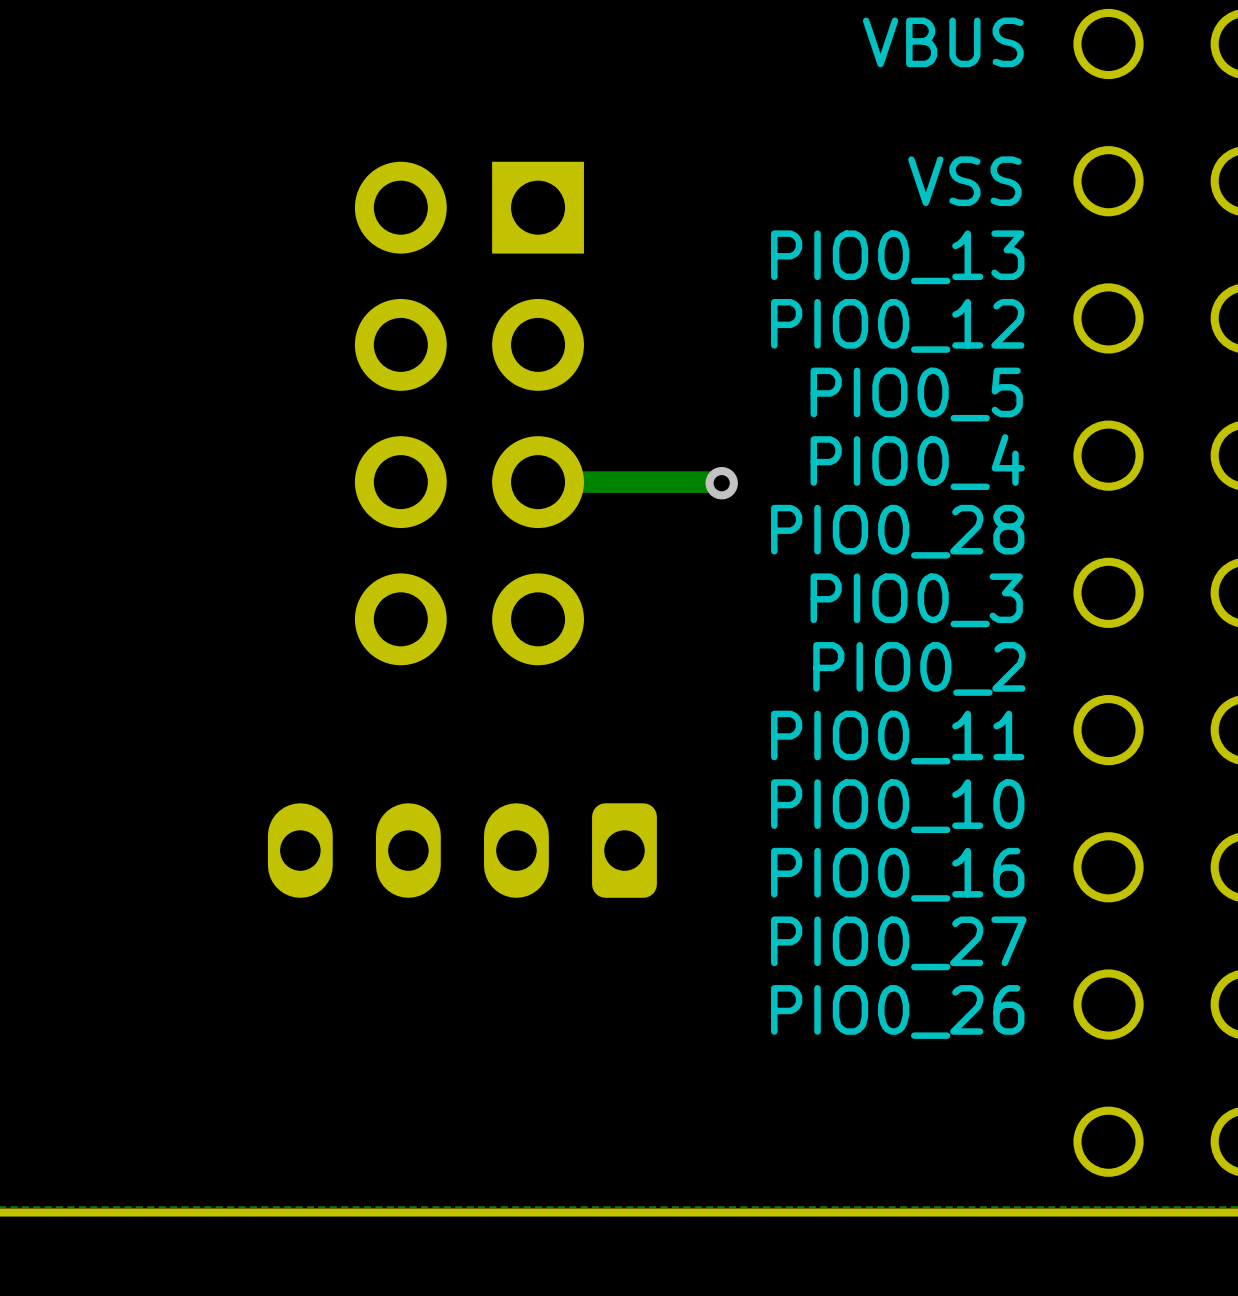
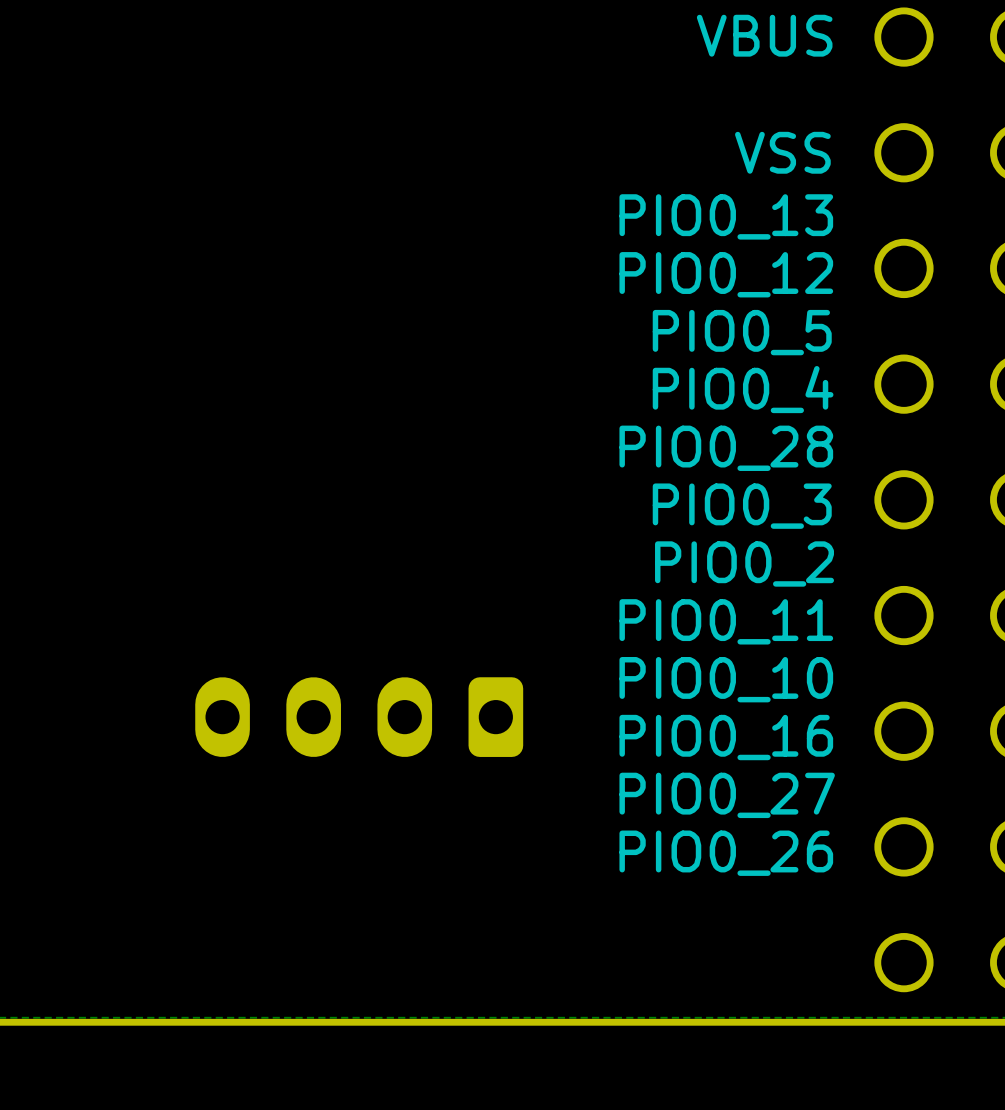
part: (469, 413) -> none
track: (538, 482) (721, 483) -> none
via: (721, 483) -> none

